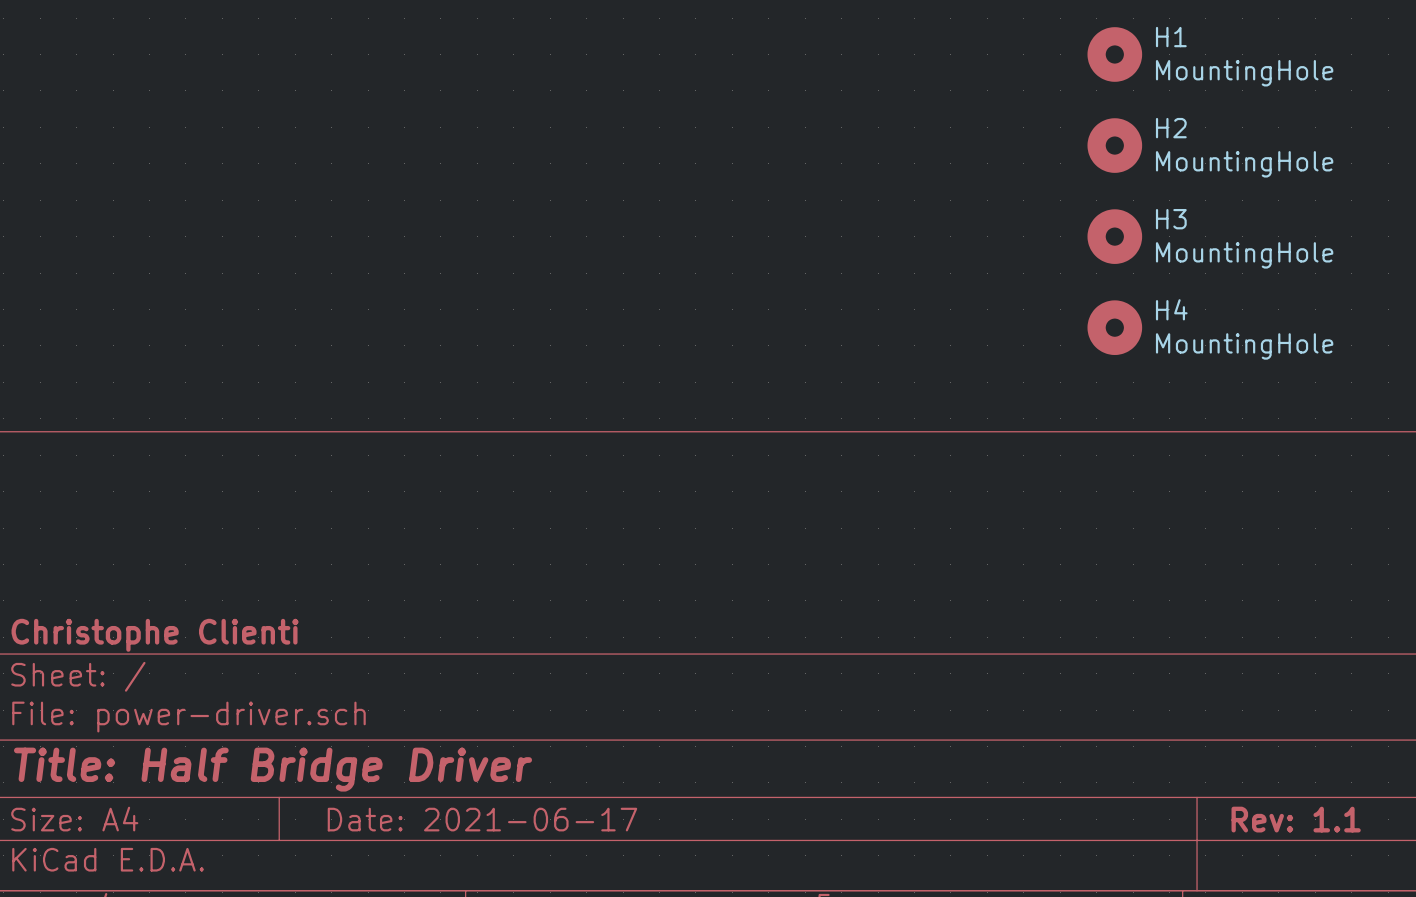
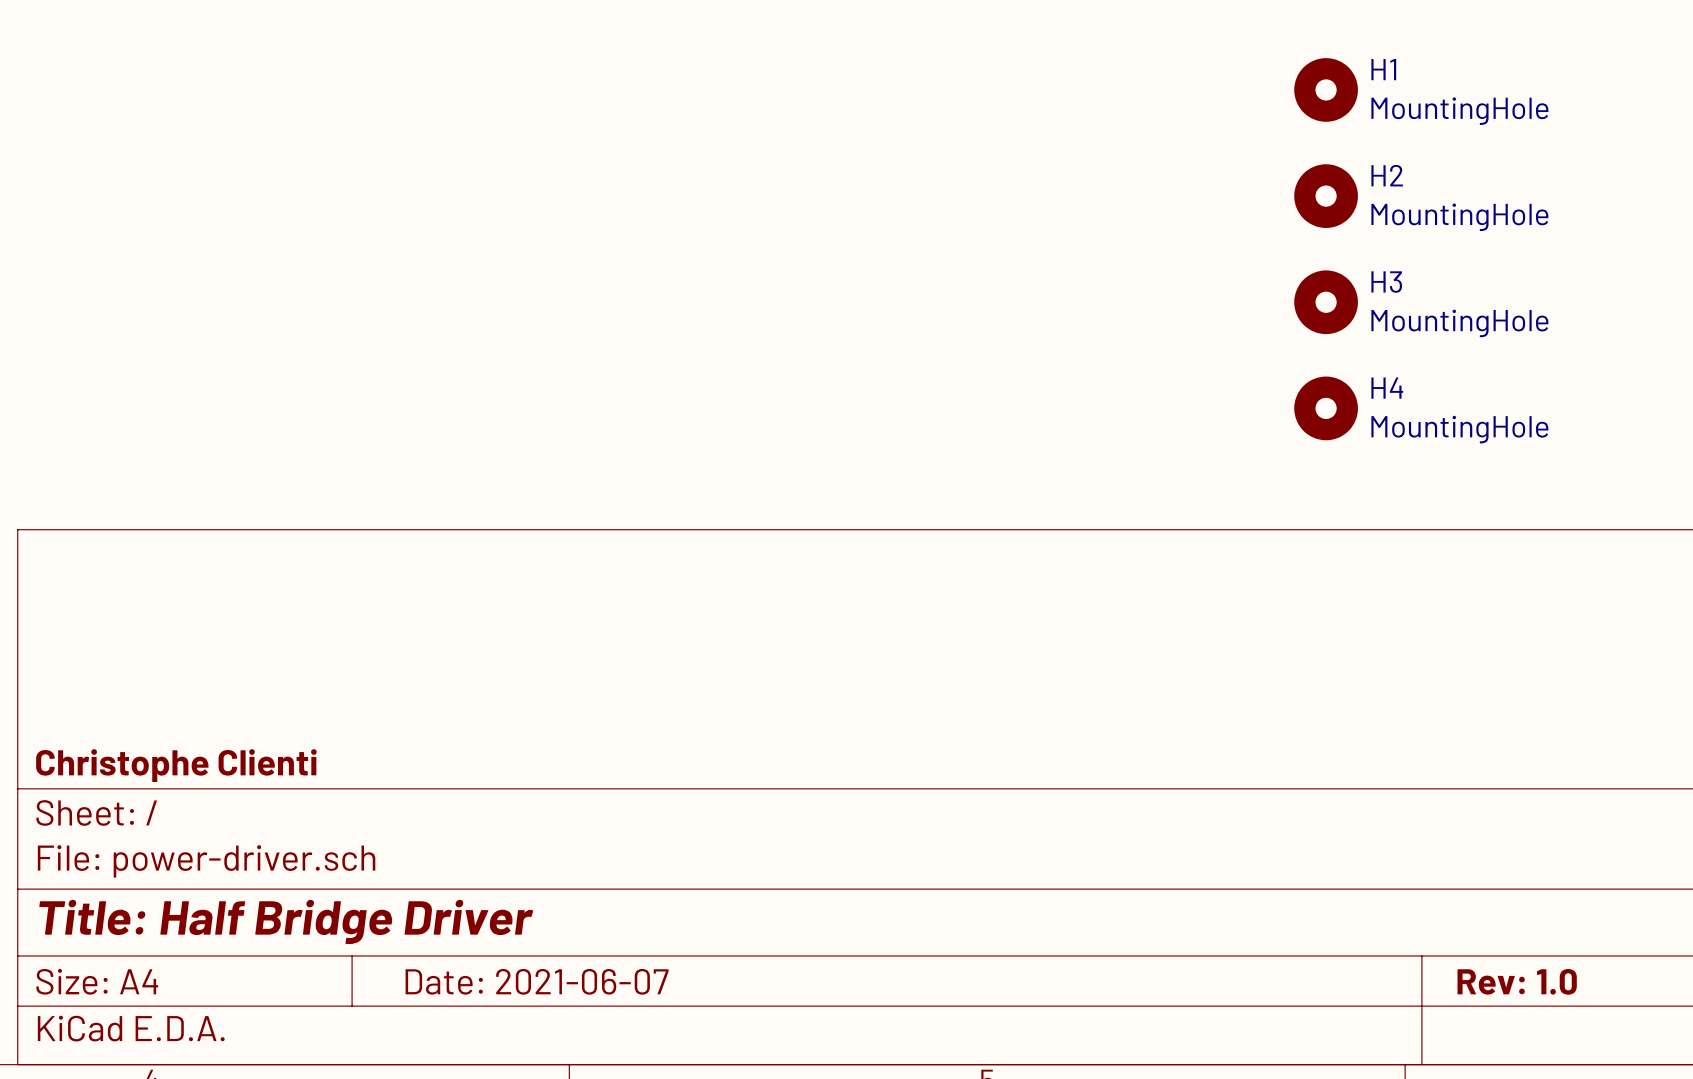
title block: Date: 2021-06-17 (482, 819) -> Date: 2021-06-07 (537, 981)
title block: Rev: 1.1 (1296, 819) -> Rev: 1.0 (1517, 981)

